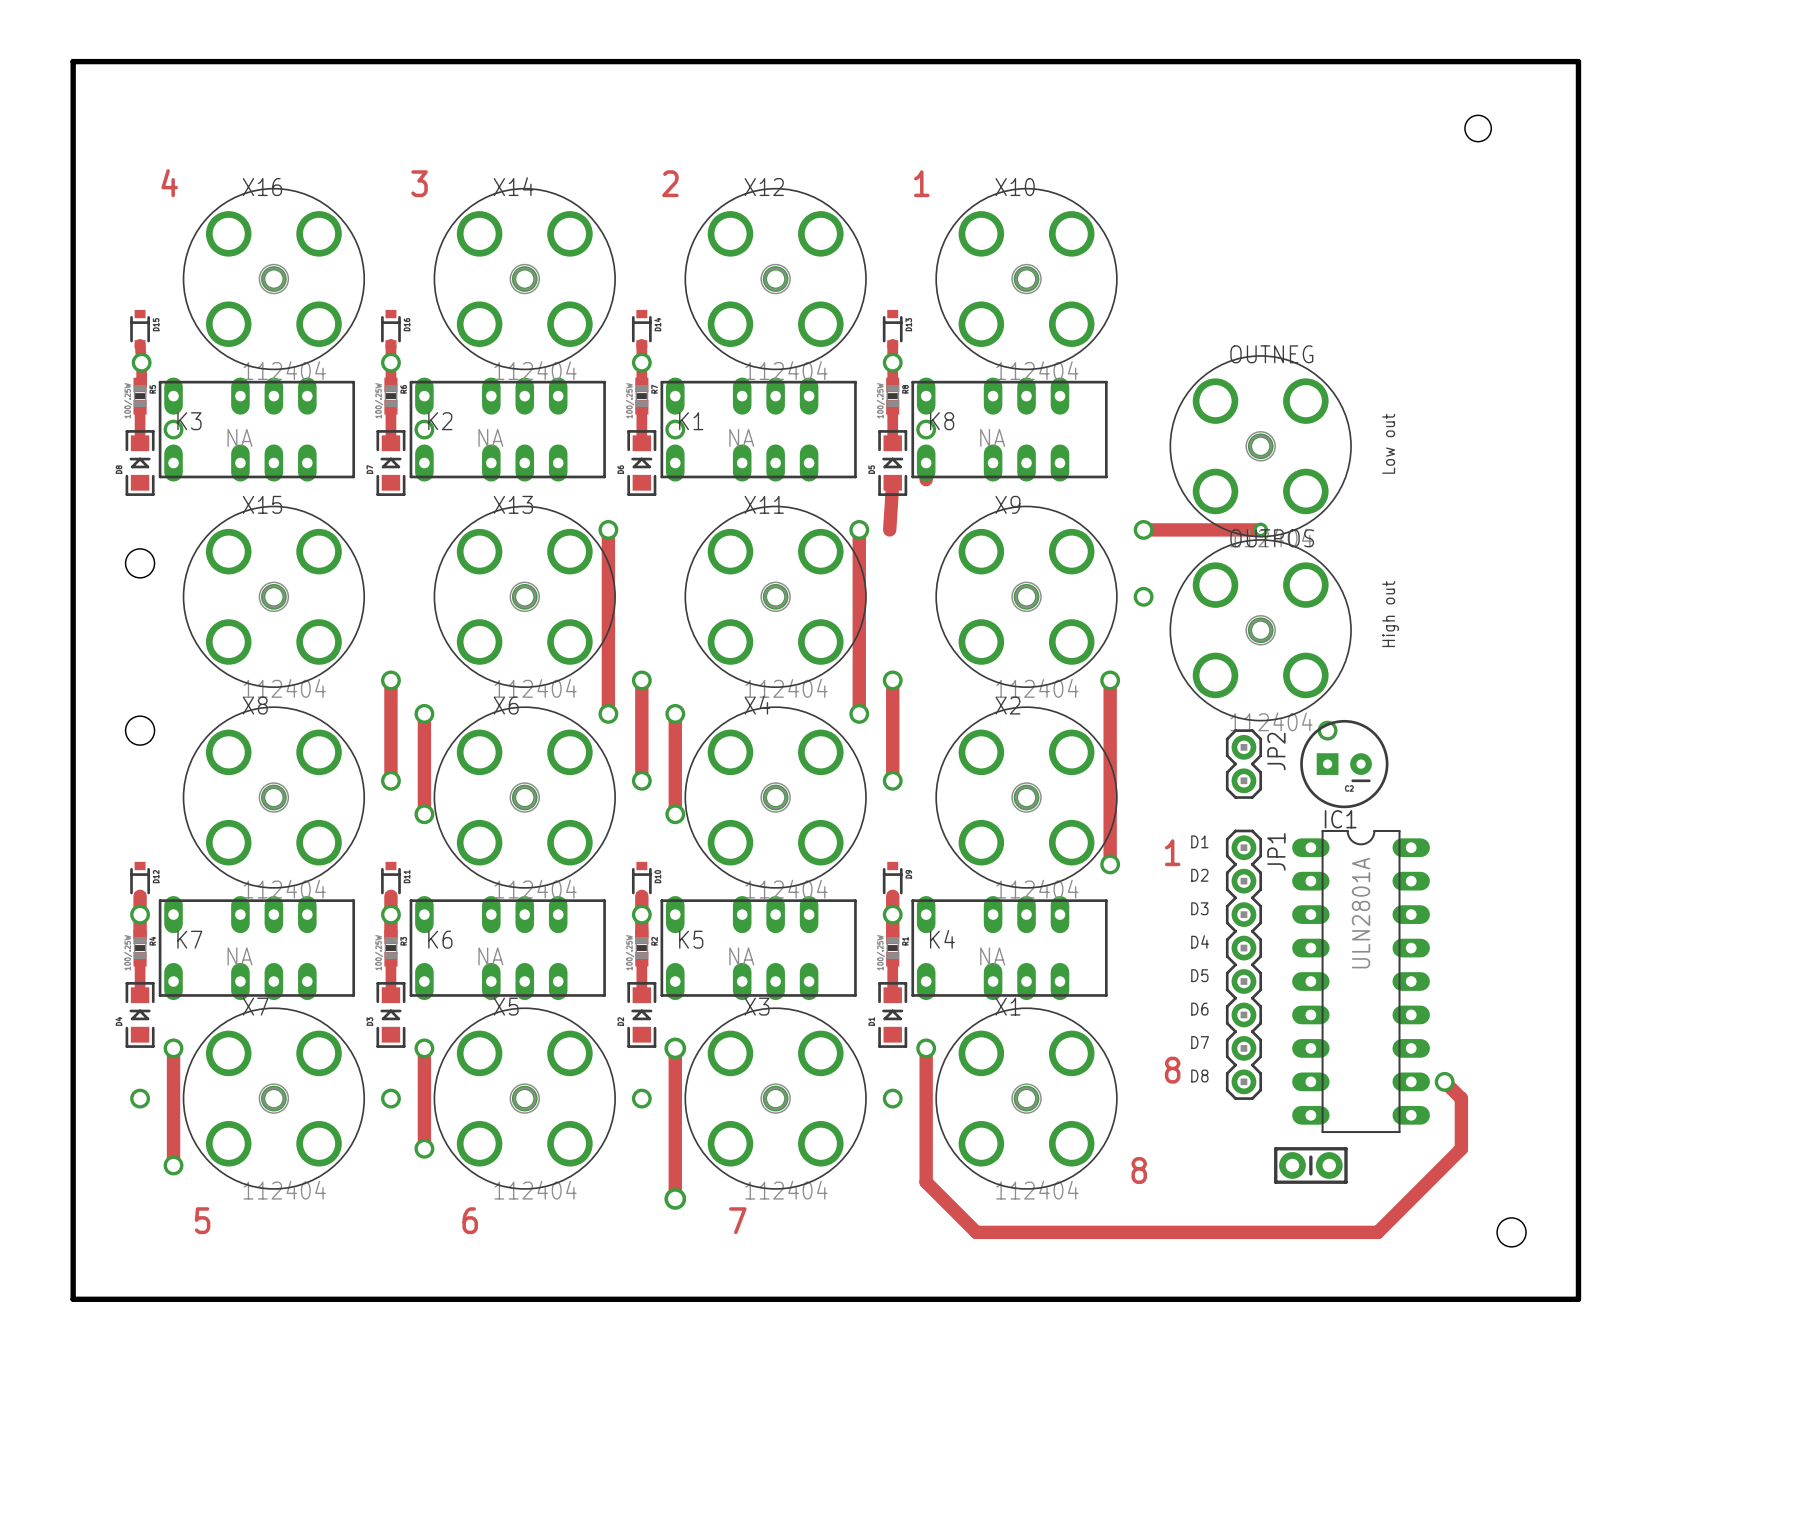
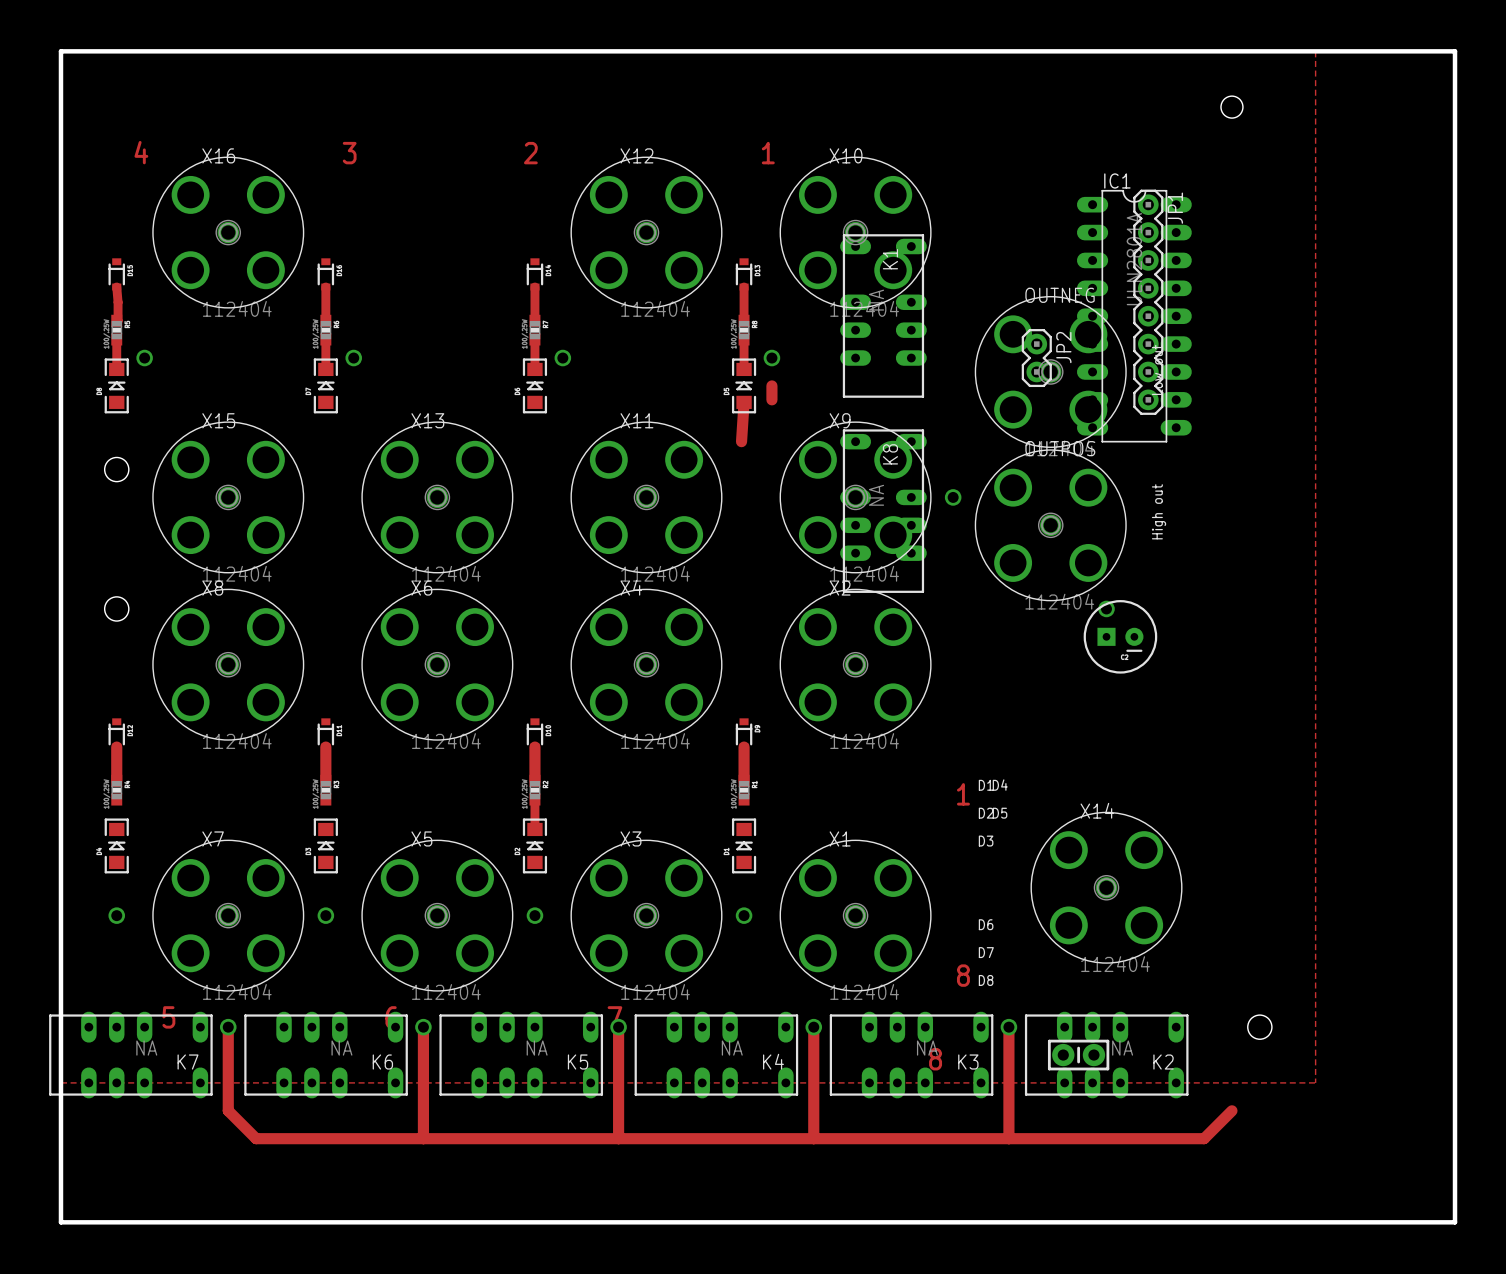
board edge: (1578, 61) (1578, 1299) (73, 1299) -> (1315, 51) (1455, 51) (1455, 1222) (60, 1222) (60, 1082)
text position: 2 (670, 183) -> 2 (530, 153)
X14 position: (524, 279) -> (1106, 887)
via: (141, 362) -> none
via: (390, 362) -> none
via: (641, 362) -> none
via: (892, 362) -> none
K3 rotation: 0° (256, 429) -> 180° (911, 1055)
K3 position: (256, 429) -> (911, 1055)
K2 rotation: 0° (507, 429) -> 180° (1106, 1055)
K2 position: (507, 429) -> (1106, 1055)
K1 rotation: 0° (758, 429) -> 90° clockwise (883, 315)
K1 position: (758, 429) -> (883, 315)
K8 rotation: 0° (1009, 429) -> 90° clockwise (883, 511)
K8 position: (1009, 429) -> (883, 511)
track: (608, 529) (608, 713) -> none
via: (608, 529) -> none
track: (859, 529) (859, 713) -> none
via: (859, 529) -> none
track: (1143, 529) (1260, 529) -> none
via: (1143, 529) -> none
via: (1260, 529) -> none
track: (390, 680) (390, 780) -> none
via: (390, 680) -> none
track: (641, 680) (641, 780) -> none
via: (641, 680) -> none
track: (892, 680) (892, 780) -> none
via: (892, 680) -> none
track: (1110, 680) (1110, 864) -> none
via: (1110, 680) -> none
track: (424, 713) (424, 814) -> none
via: (424, 713) -> none
via: (608, 713) -> none
track: (675, 713) (675, 814) -> none
via: (675, 713) -> none
via: (859, 713) -> none
JP2 position: (1243, 764) -> (1036, 358)
via: (390, 780) -> none
via: (641, 780) -> none
via: (892, 780) -> none
via: (424, 814) -> none
via: (675, 814) -> none
text position: D1 (1199, 841) -> D1 (986, 785)
text position: 1 (1172, 852) -> 1 (963, 794)
via: (1110, 864) -> none
text position: D2 (1199, 875) -> D2 (986, 813)
text position: D3 (1199, 908) -> D3 (986, 841)
via: (140, 914) -> none
via: (390, 914) -> none
via: (641, 914) -> none
via: (892, 914) -> none
K7 rotation: 0° (256, 948) -> 180° (130, 1055)
K7 position: (256, 948) -> (130, 1055)
K6 rotation: 0° (507, 948) -> 180° (326, 1055)
K6 position: (507, 948) -> (326, 1055)
K5 rotation: 0° (758, 948) -> 180° (521, 1055)
K5 position: (758, 948) -> (521, 1055)
K4 rotation: 0° (1009, 948) -> 180° (716, 1055)
K4 position: (1009, 948) -> (716, 1055)
track: (140, 959) (140, 995) -> none
track: (390, 959) (390, 995) -> none
track: (892, 959) (892, 995) -> none
JP1 position: (1243, 964) -> (1148, 302)
IC1 position: (1361, 981) -> (1134, 316)
text position: D6 (1199, 1009) -> D6 (986, 924)
text position: D7 (1200, 1042) -> D7 (986, 952)
track: (173, 1048) (173, 1165) -> none
via: (173, 1048) -> none
track: (424, 1048) (424, 1148) -> none
via: (424, 1048) -> none
track: (675, 1048) (675, 1198) -> none
via: (675, 1048) -> none
track: (926, 1048) (926, 1182) (976, 1232) (1377, 1232) (1461, 1148) (1461, 1098) (1444, 1081) -> none
via: (926, 1048) -> none
text: 8 (1172, 1070) -> none
text position: D8 (1199, 1076) -> D8 (986, 980)
via: (1444, 1081) -> none
via: (424, 1148) -> none
via: (173, 1165) -> none
part position: (1310, 1165) -> (1078, 1055)
text position: 8 (1139, 1170) -> 8 (963, 975)
via: (675, 1198) -> none
track: none -> (228, 1027) (228, 1110) (256, 1138) (1204, 1138) (1231, 1110)
via: none -> (228, 1027)
track: none -> (423, 1027) (423, 1138)
via: none -> (423, 1027)
track: none -> (618, 1027) (618, 1138)
via: none -> (618, 1027)
track: none -> (813, 1027) (813, 1138)
via: none -> (813, 1027)
track: none -> (1008, 1027) (1008, 1138)
via: none -> (1008, 1027)
text: none -> 8 (935, 1059)

